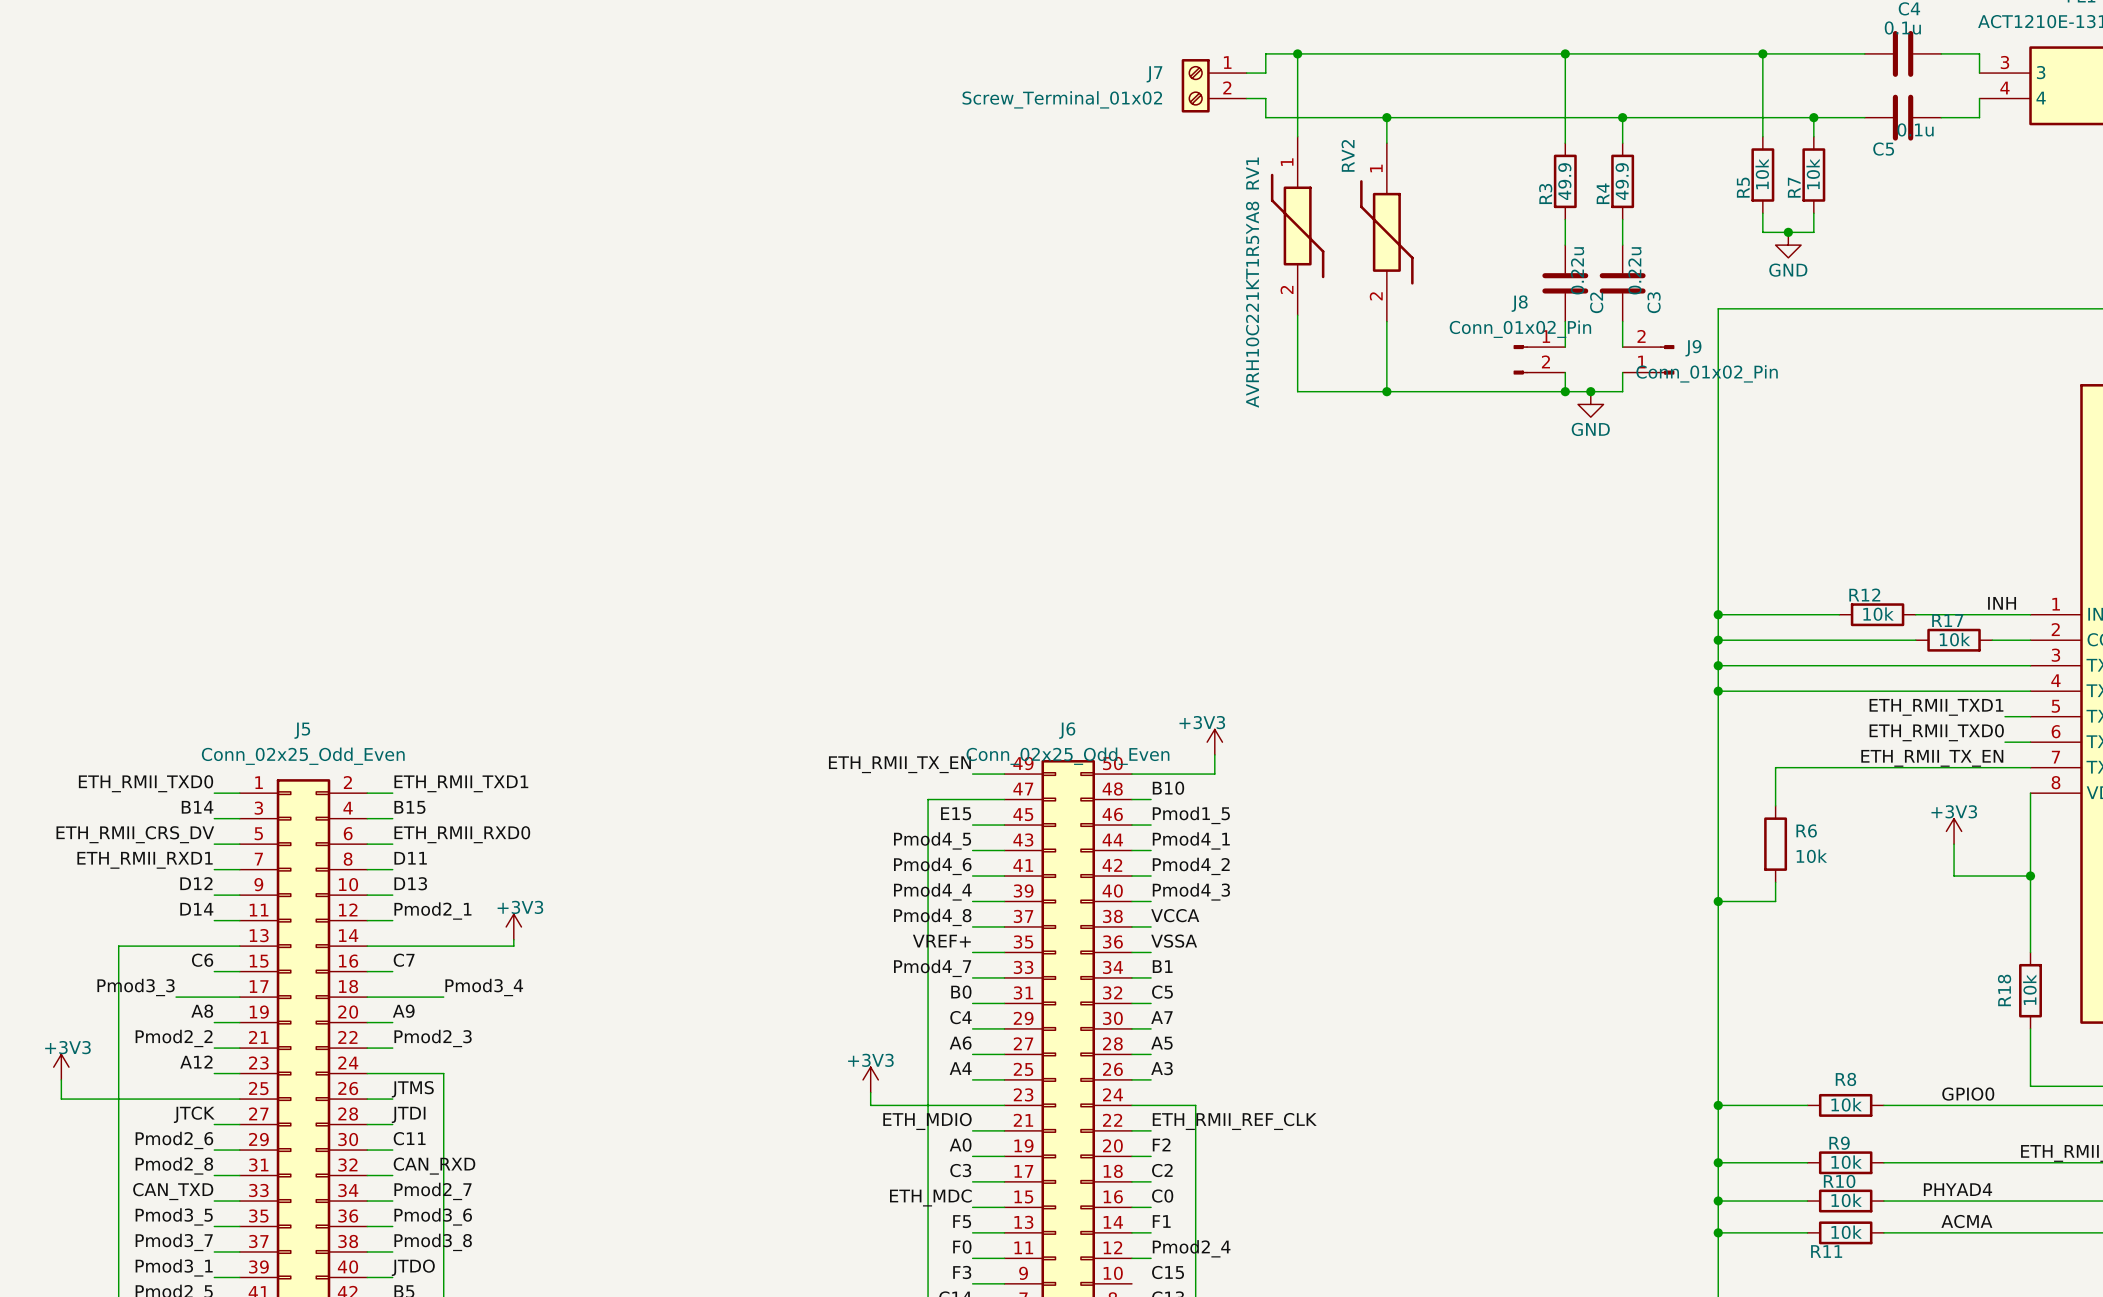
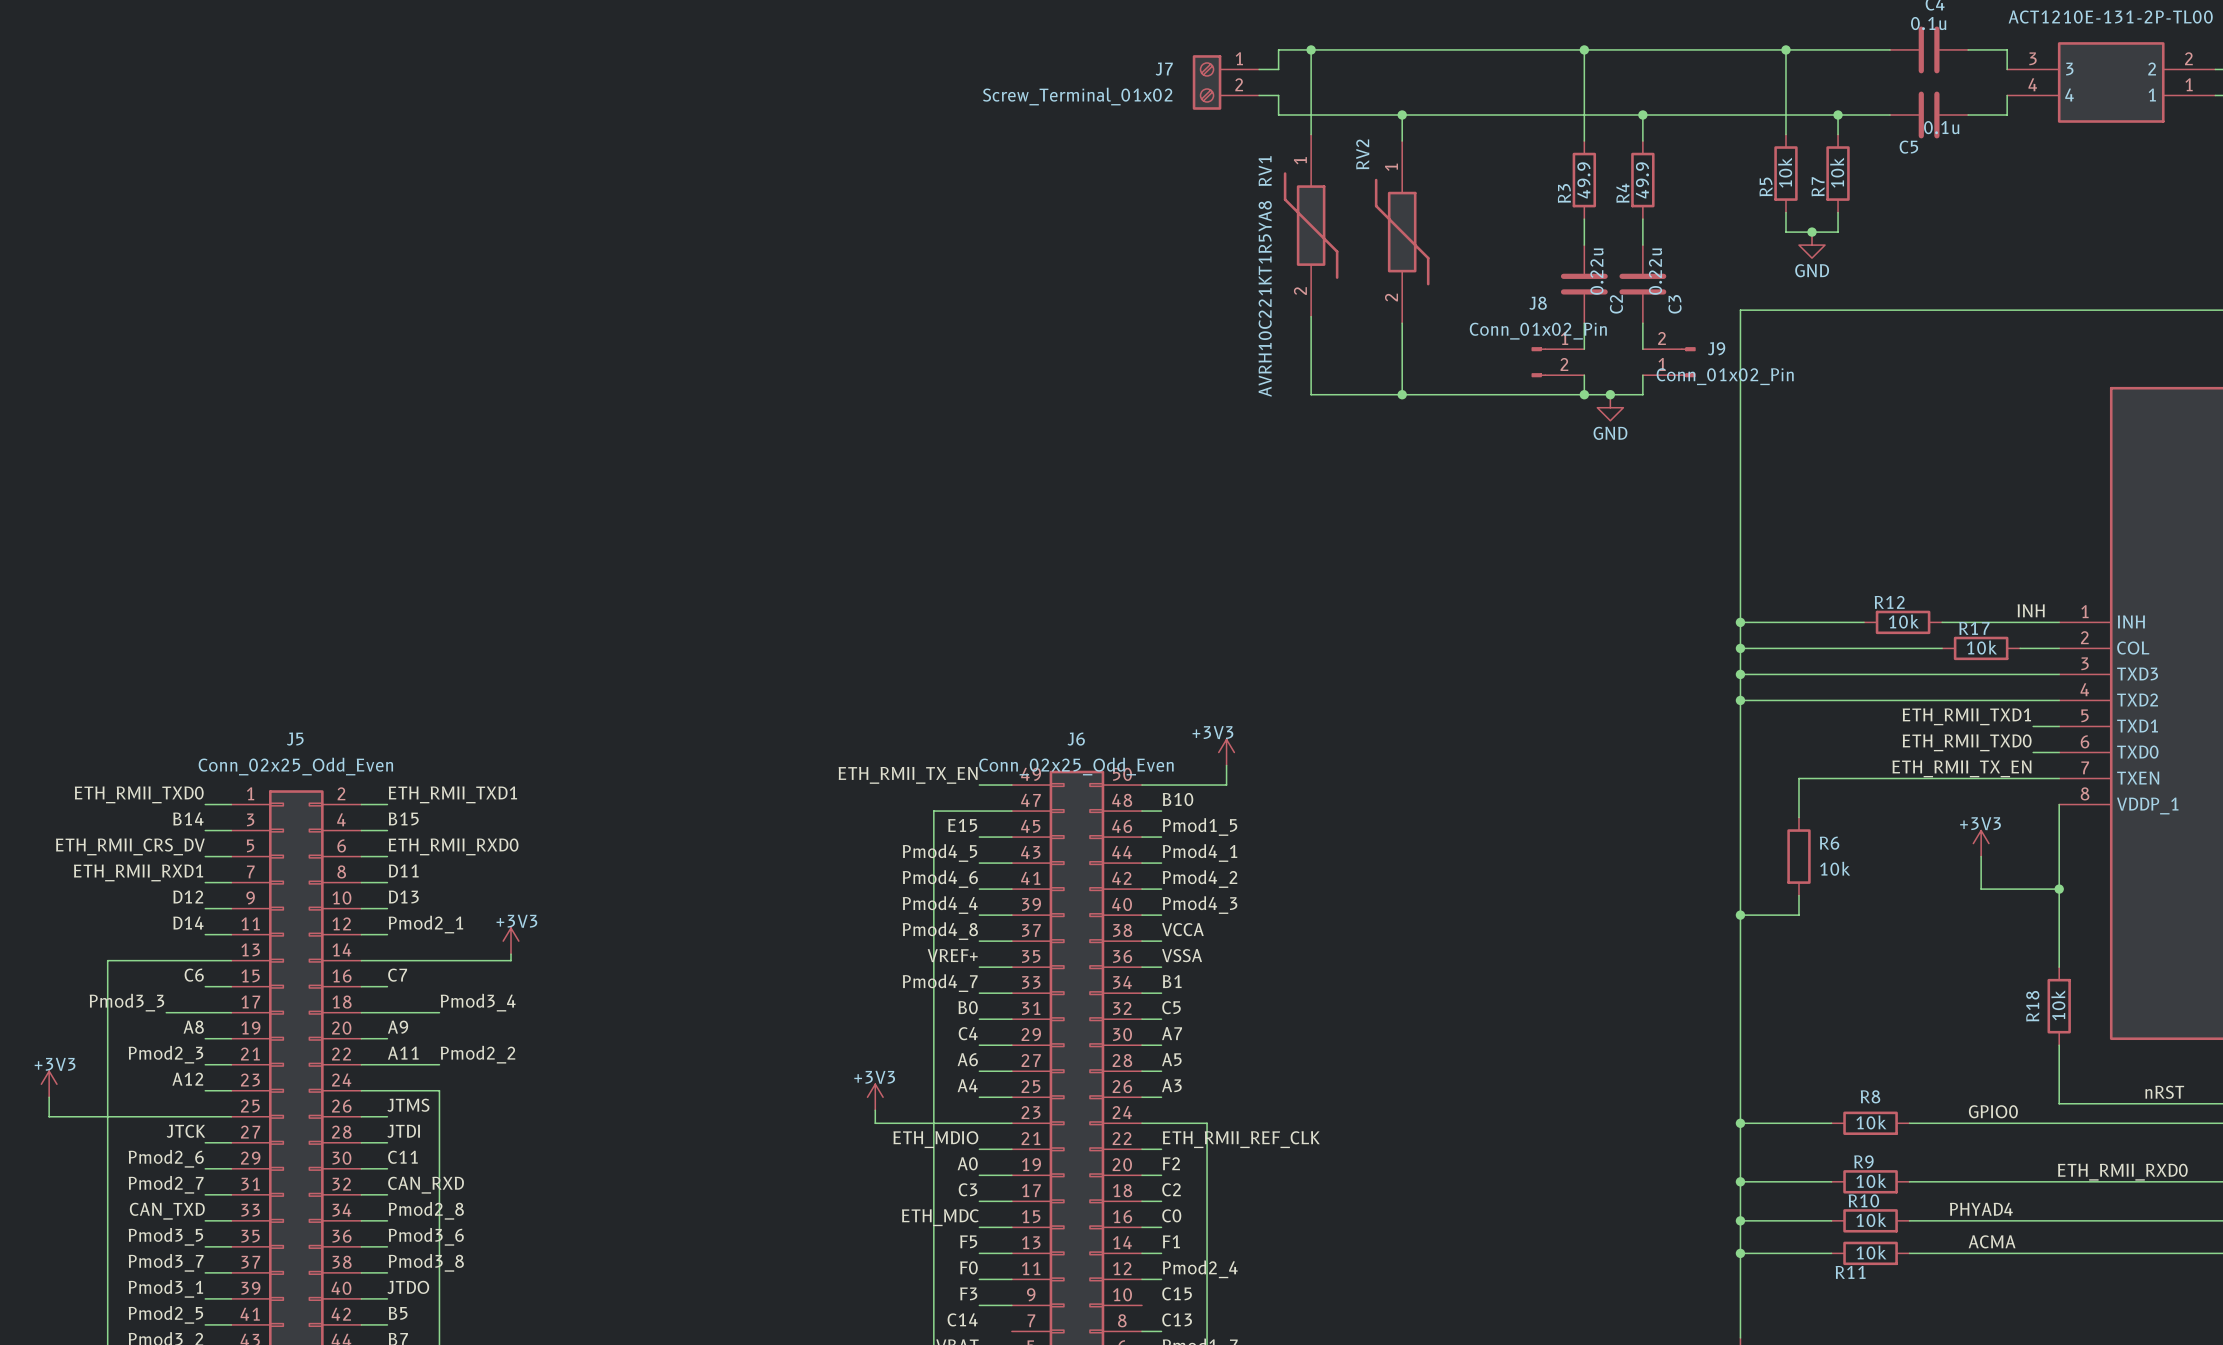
label: Pmod2_2 (174, 1038) -> Pmod2_3 (165, 1054)
label: Pmod2_3 (433, 1038) -> A11 (403, 1053)
label: none -> Pmod2_2 (478, 1054)
wire: none -> (387, 1064) (439, 1064)
label: Pmod2_8 (174, 1165) -> Pmod2_7 (166, 1184)
label: Pmod2_7 (433, 1191) -> Pmod2_8 (426, 1210)

